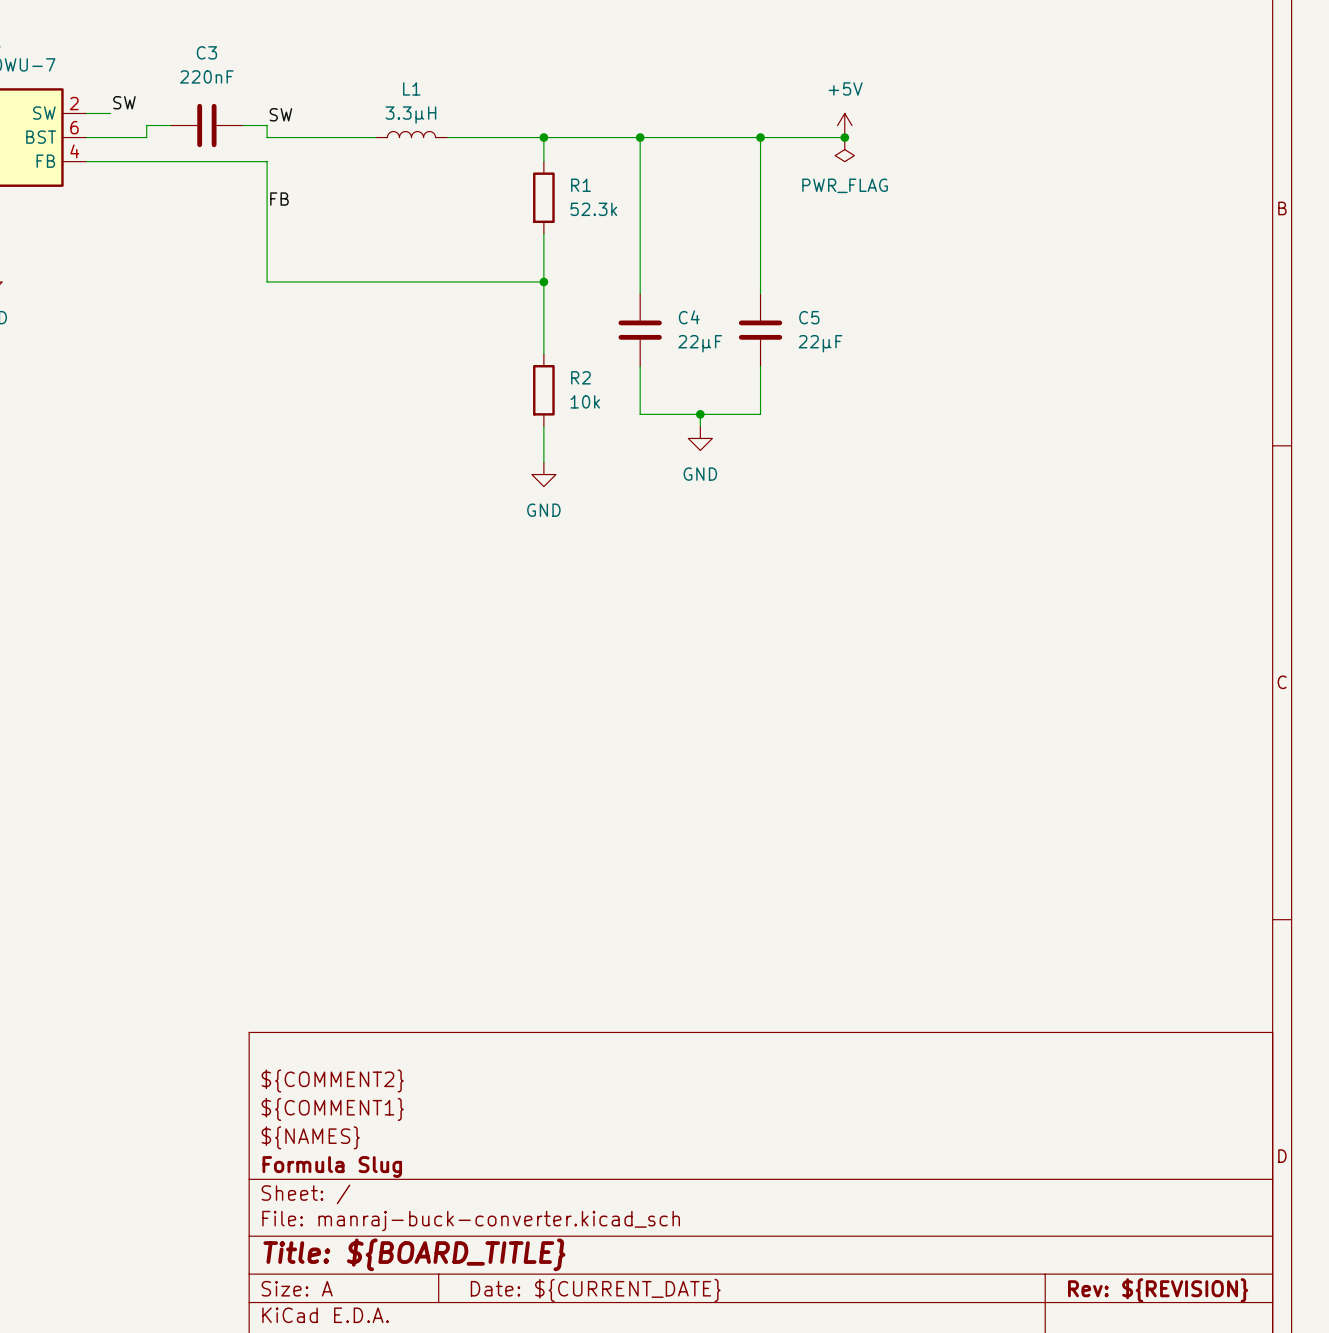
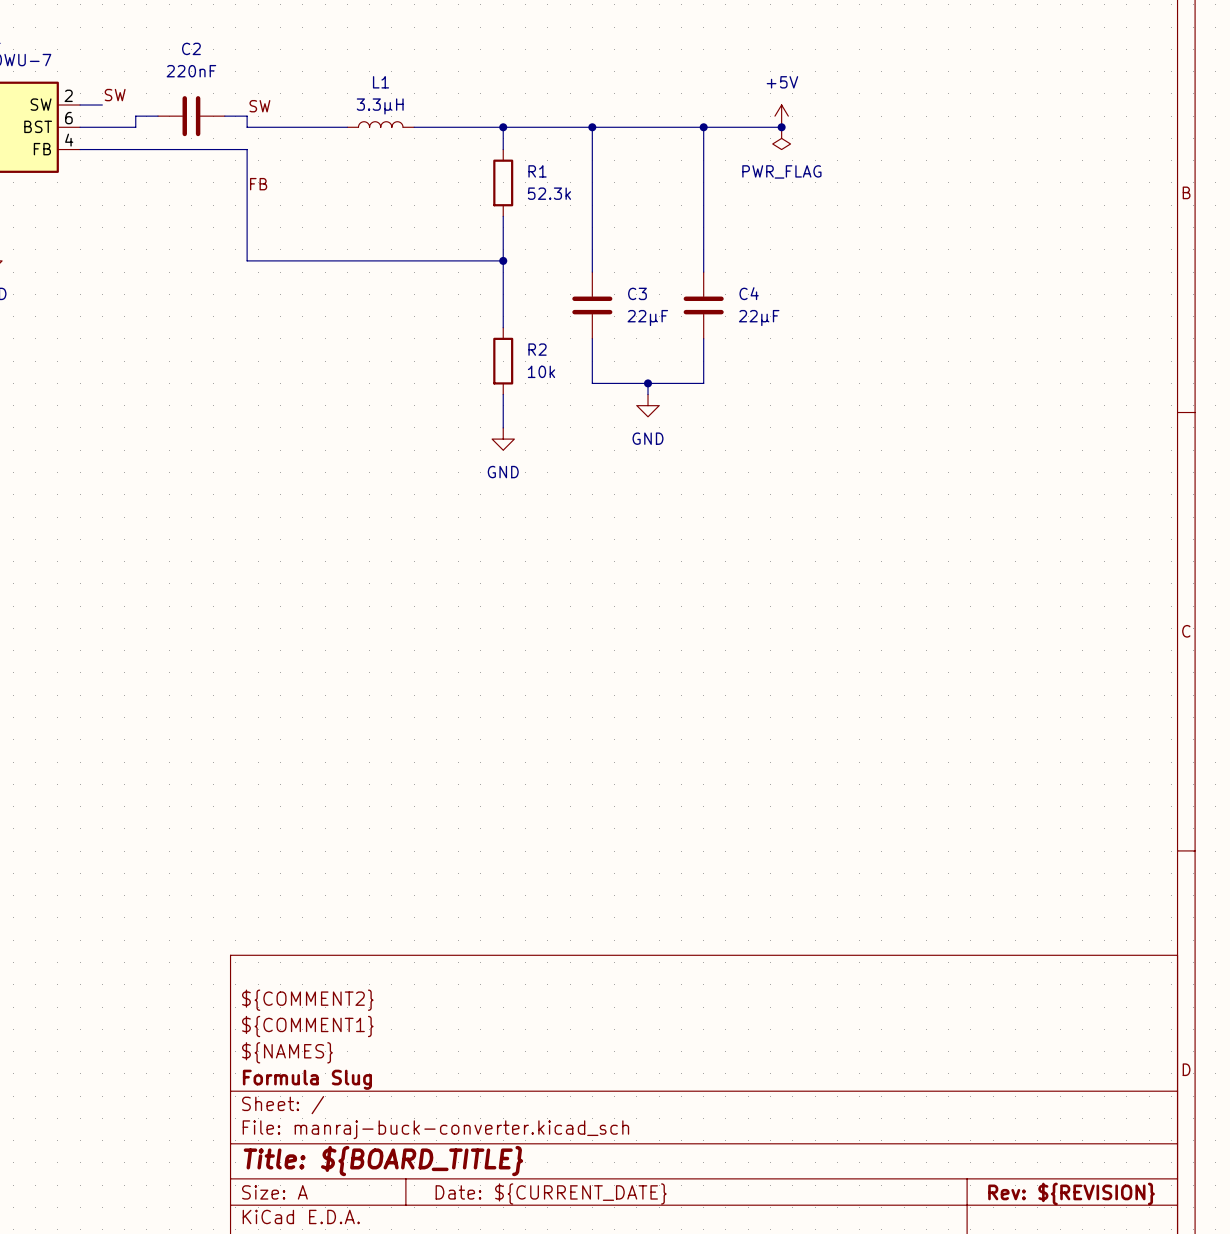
C3 name: C3 (206, 52) -> C2 (191, 48)
C4 name: C4 (689, 317) -> C3 (637, 293)
C5 name: C5 (809, 317) -> C4 (749, 293)

